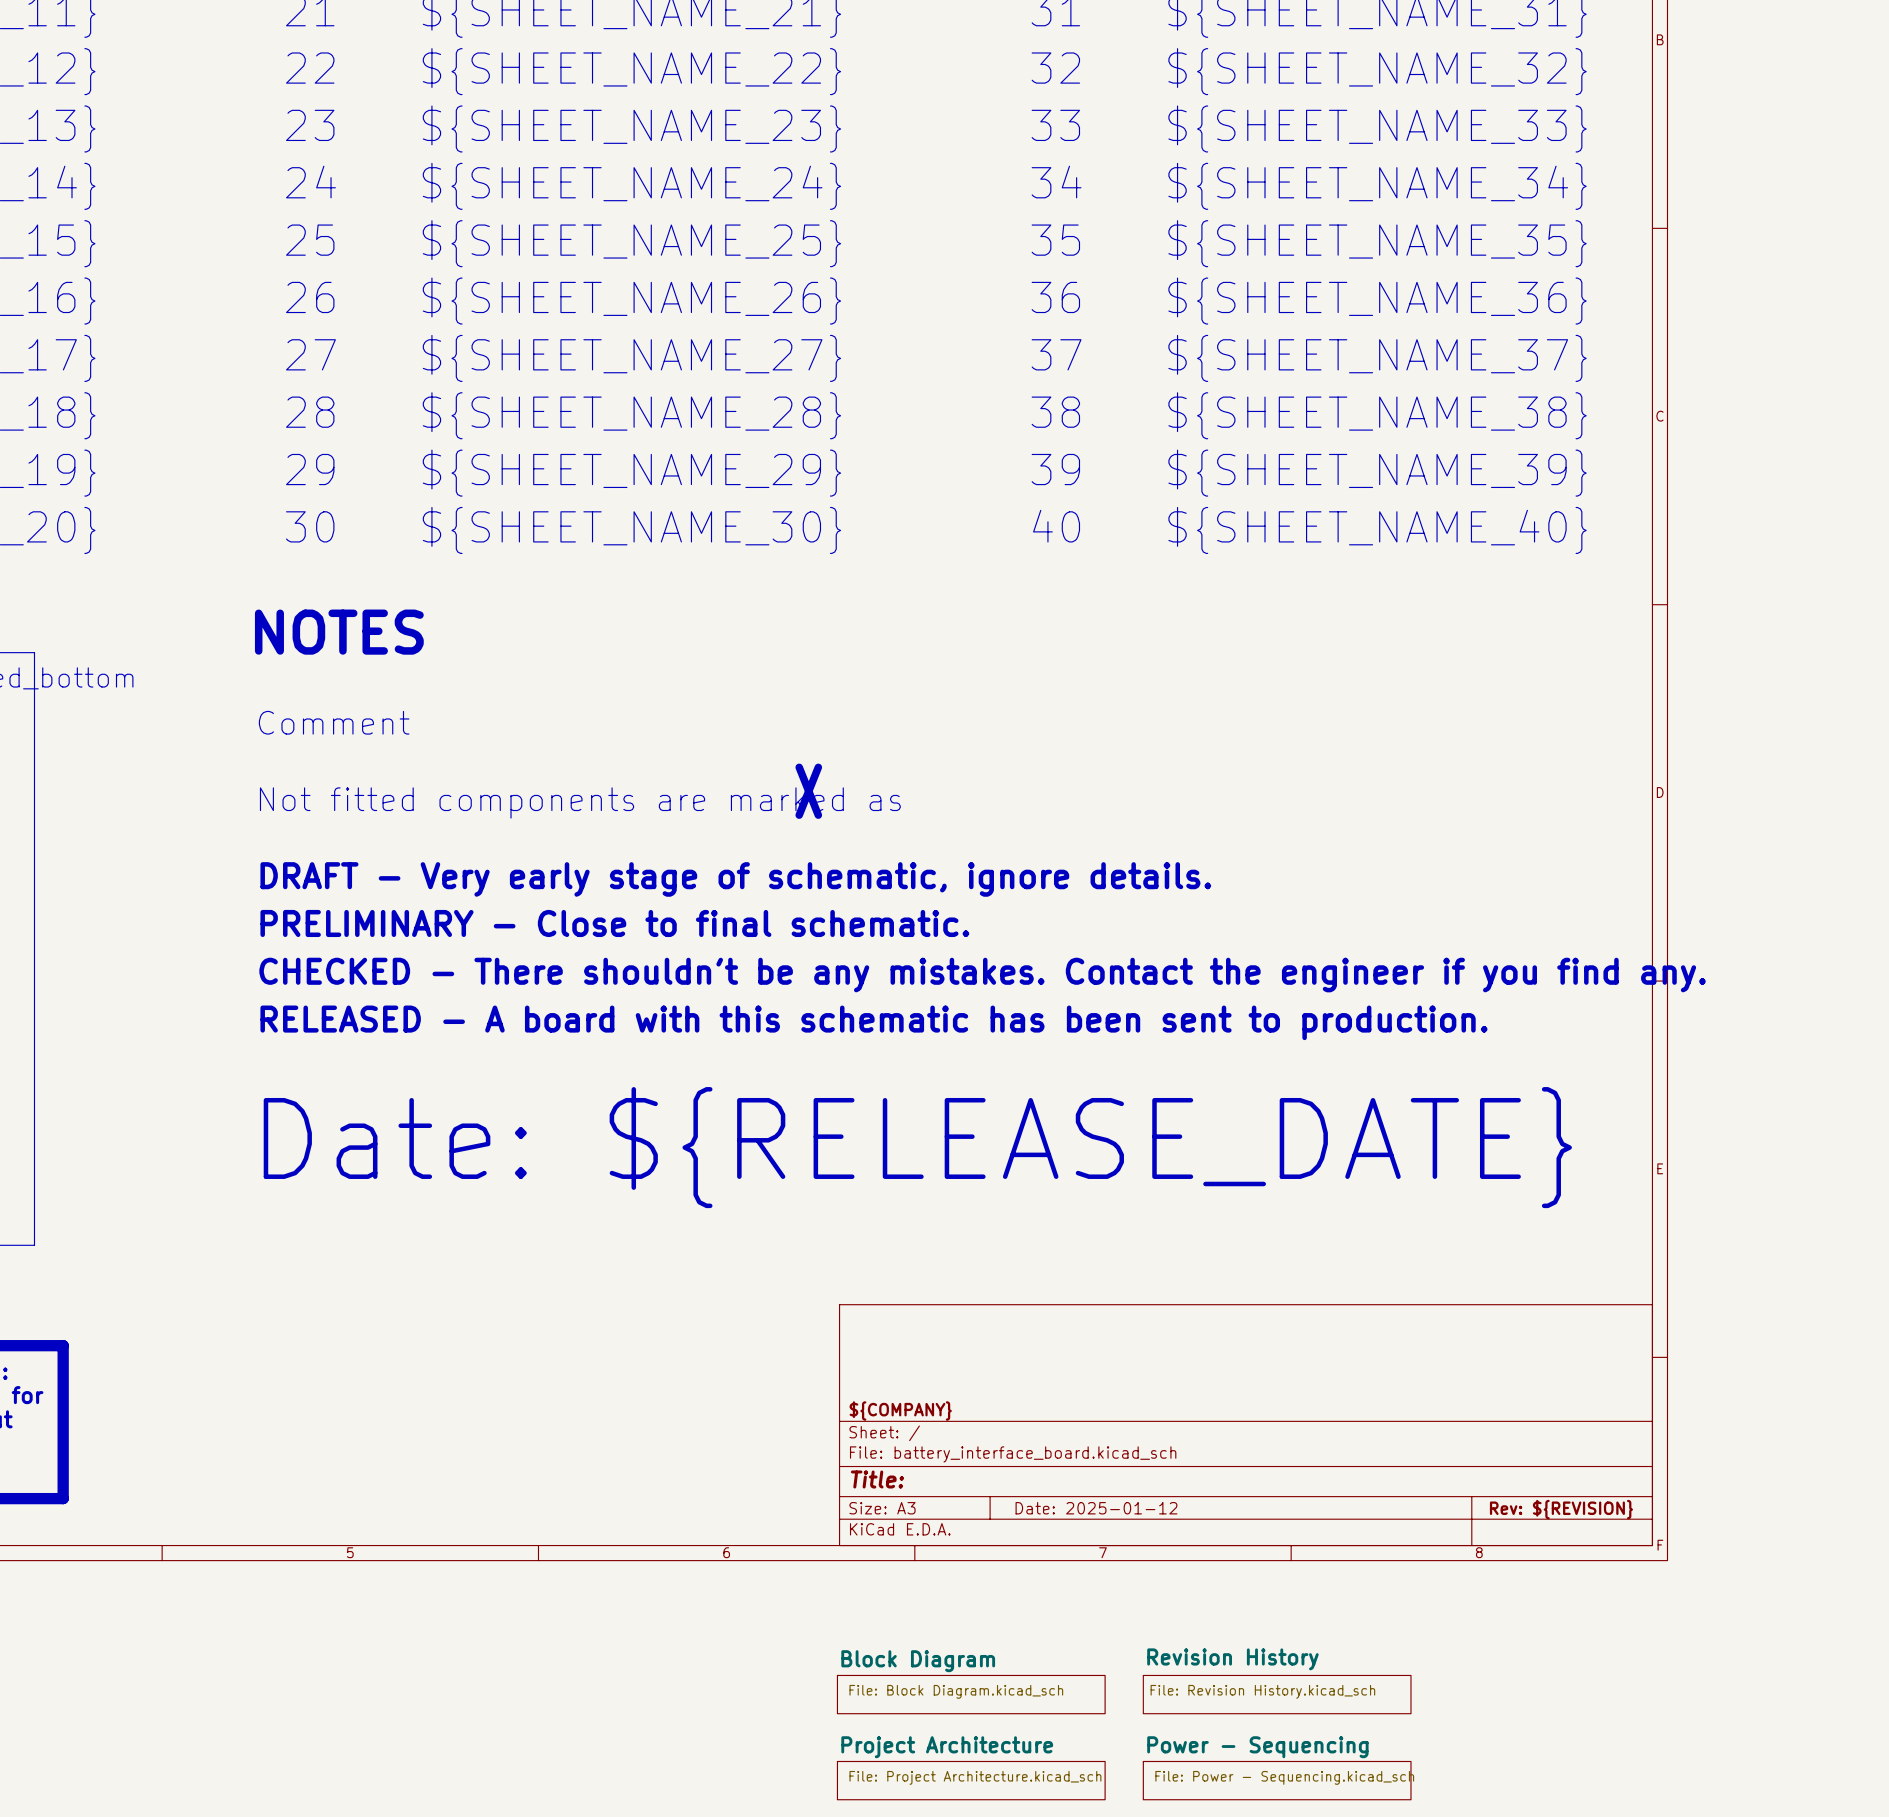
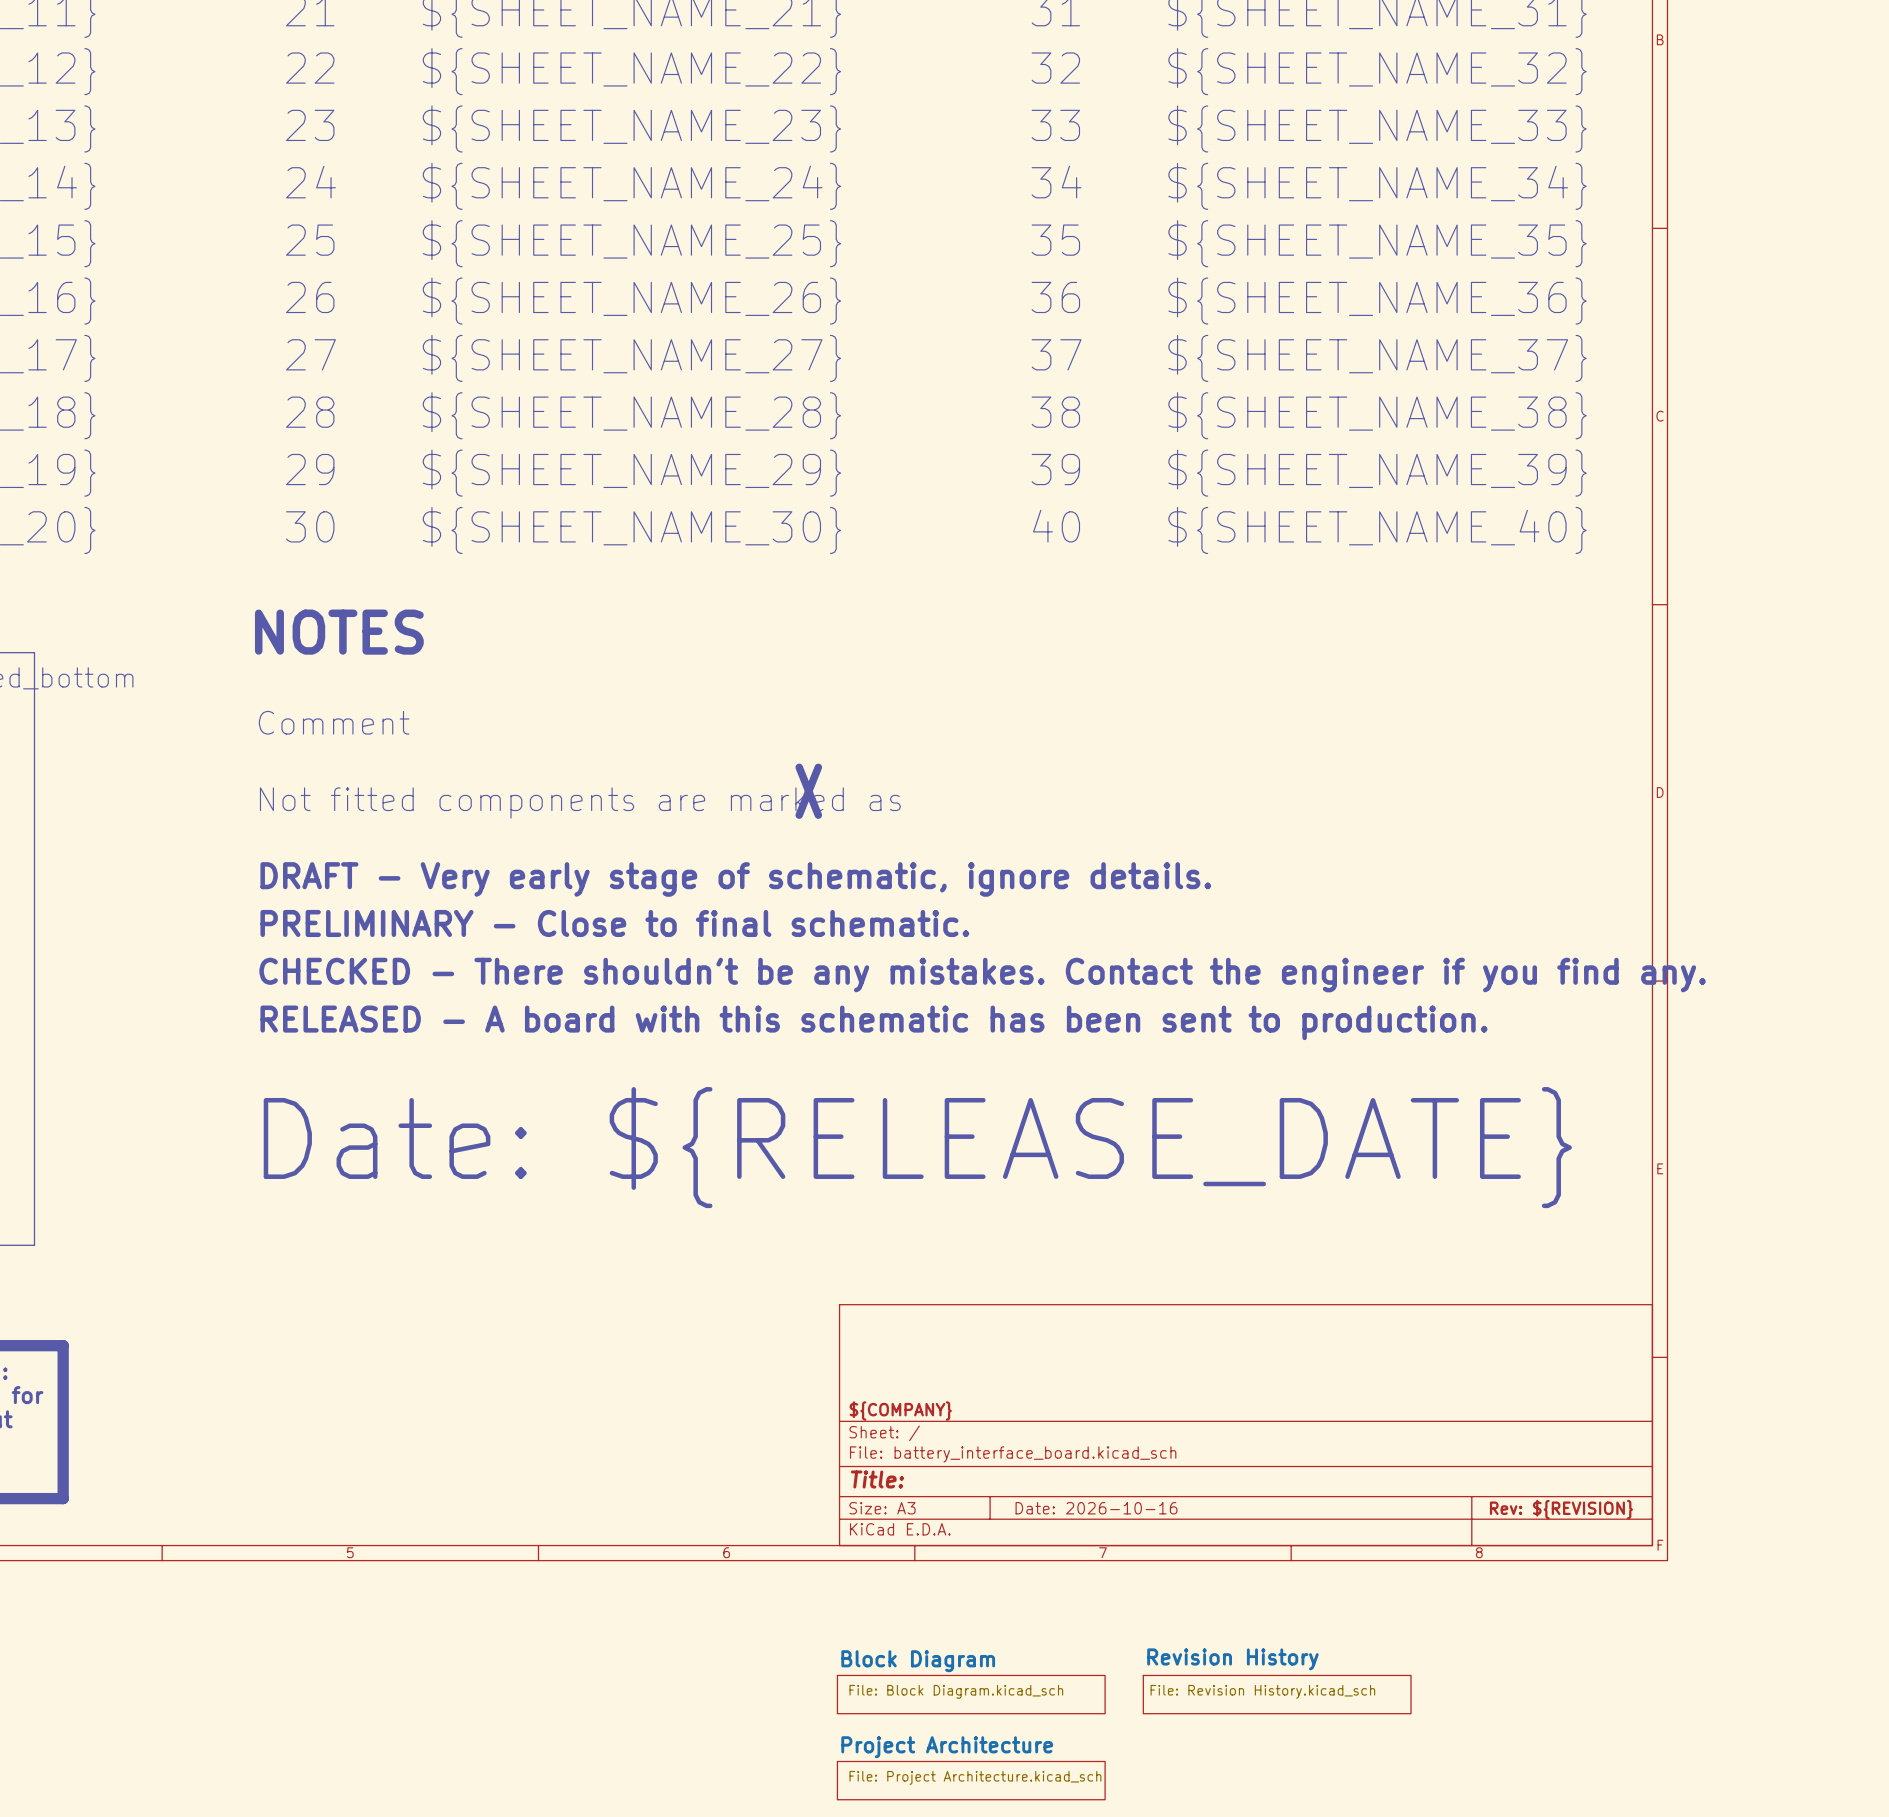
title block: Date: 2025-01-12 (1096, 1508) -> Date: 2026-10-16 (1096, 1508)
sheet Power - Sequencing: File: Power - Sequencing.kicad_sch (1277, 1780) -> none

